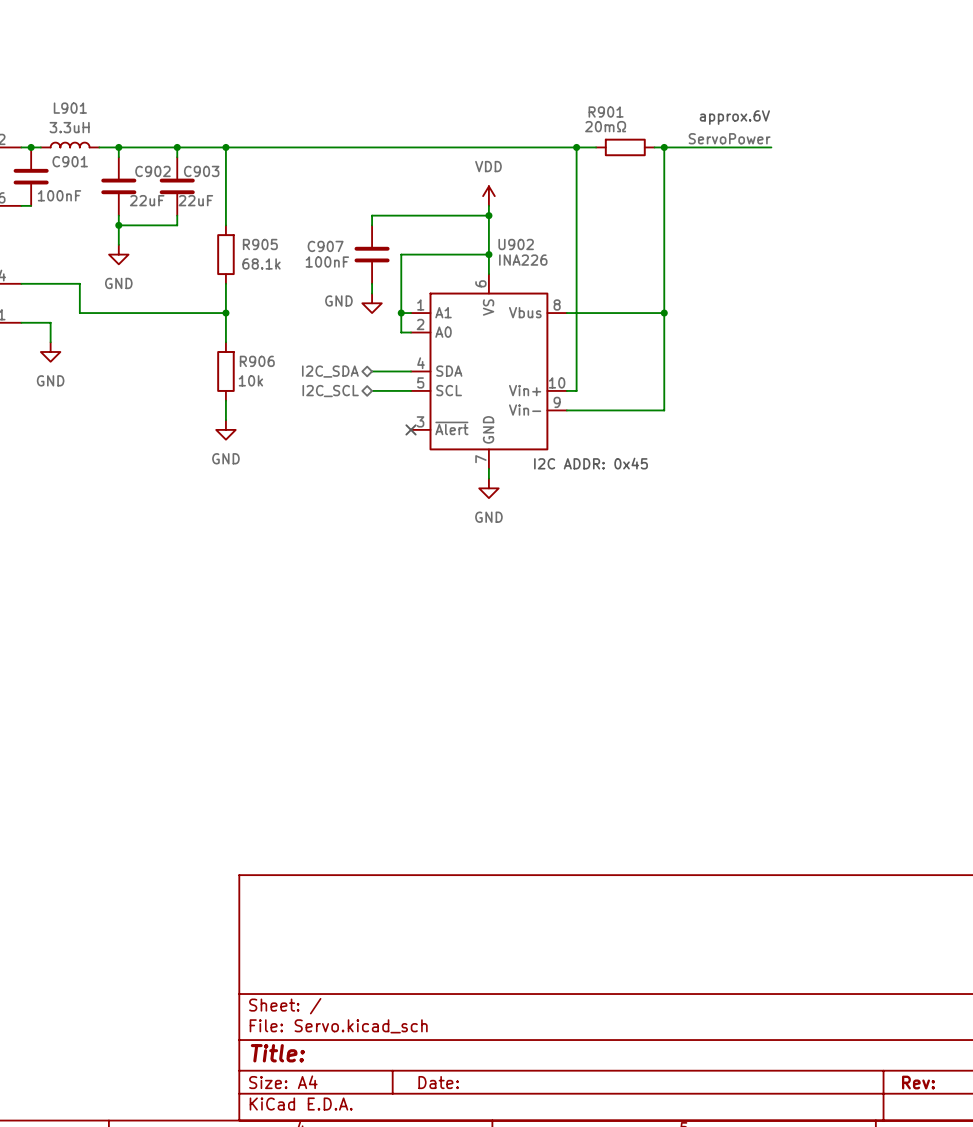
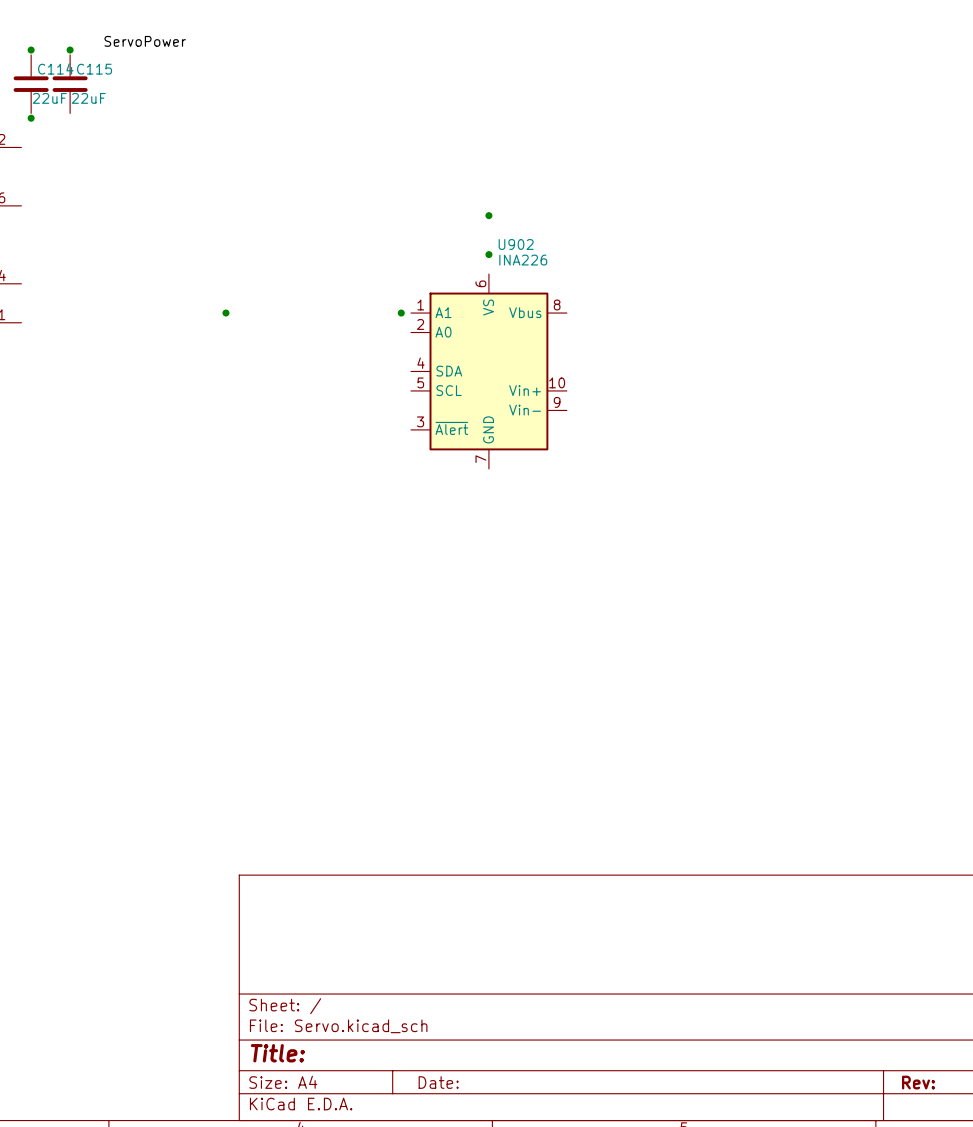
label: none -> ServoPower (145, 41)
junction: none -> (31, 50)
junction: none -> (70, 50)
C114: none -> 22uF (31, 84)
C115: none -> 22uF (70, 84)
text: approx.6V (734, 117) -> none
junction: none -> (31, 118)
label: ServoPower (729, 138) -> none
L901: 3.3uH (70, 145) -> none
wire: (21, 147) (40, 147) -> none
junction: (31, 147) -> none
wire: (99, 147) (596, 147) -> none
wire: (118, 147) (118, 157) -> none
junction: (118, 147) -> none
wire: (177, 147) (177, 157) -> none
junction: (177, 147) -> none
wire: (225, 147) (225, 225) -> none
junction: (225, 147) -> none
wire: (576, 147) (576, 390) (566, 390) -> none
junction: (576, 147) -> none
R901: 20mΩ (625, 147) -> none
wire: (654, 147) (771, 147) -> none
wire: (664, 147) (664, 410) (566, 410) -> none
junction: (664, 147) -> none
C901: 100nF (31, 176) -> none
C902: 22uF (118, 186) -> none
C903: 22uF (177, 186) -> none
power symbol: VDD (488, 196) -> none
wire: (21, 205) (31, 205) -> none
wire: (488, 205) (488, 274) -> none
wire: (118, 215) (118, 244) -> none
wire: (177, 215) (177, 225) (118, 225) -> none
wire: (488, 215) (372, 215) (372, 225) -> none
junction: (118, 225) -> none
power symbol: GND (118, 254) -> none
R905: 68.1k (225, 254) -> none
C907: 100nF (372, 254) -> none
wire: (488, 254) (401, 254) (401, 332) (411, 332) -> none
wire: (21, 283) (79, 283) (79, 313) (225, 313) -> none
wire: (225, 283) (225, 342) -> none
wire: (372, 283) (372, 293) -> none
power symbol: GND (372, 303) -> none
wire: (401, 313) (411, 313) -> none
wire: (566, 313) (664, 313) -> none
junction: (664, 313) -> none
wire: (21, 322) (50, 322) (50, 342) -> none
power symbol: GND (50, 351) -> none
R906: 10k (225, 371) -> none
hierarchical label: I2C_SDA (330, 371) -> none
wire: (372, 371) (411, 371) -> none
wire: (372, 390) (411, 390) -> none
hierarchical label: I2C_SCL (330, 391) -> none
wire: (225, 400) (225, 420) -> none
power symbol: GND (225, 429) -> none
no-connect mark: (411, 429) -> none
text: I2C ADDR: 0x45 (591, 463) -> none
wire: (488, 468) (488, 478) -> none
power symbol: GND (488, 488) -> none

